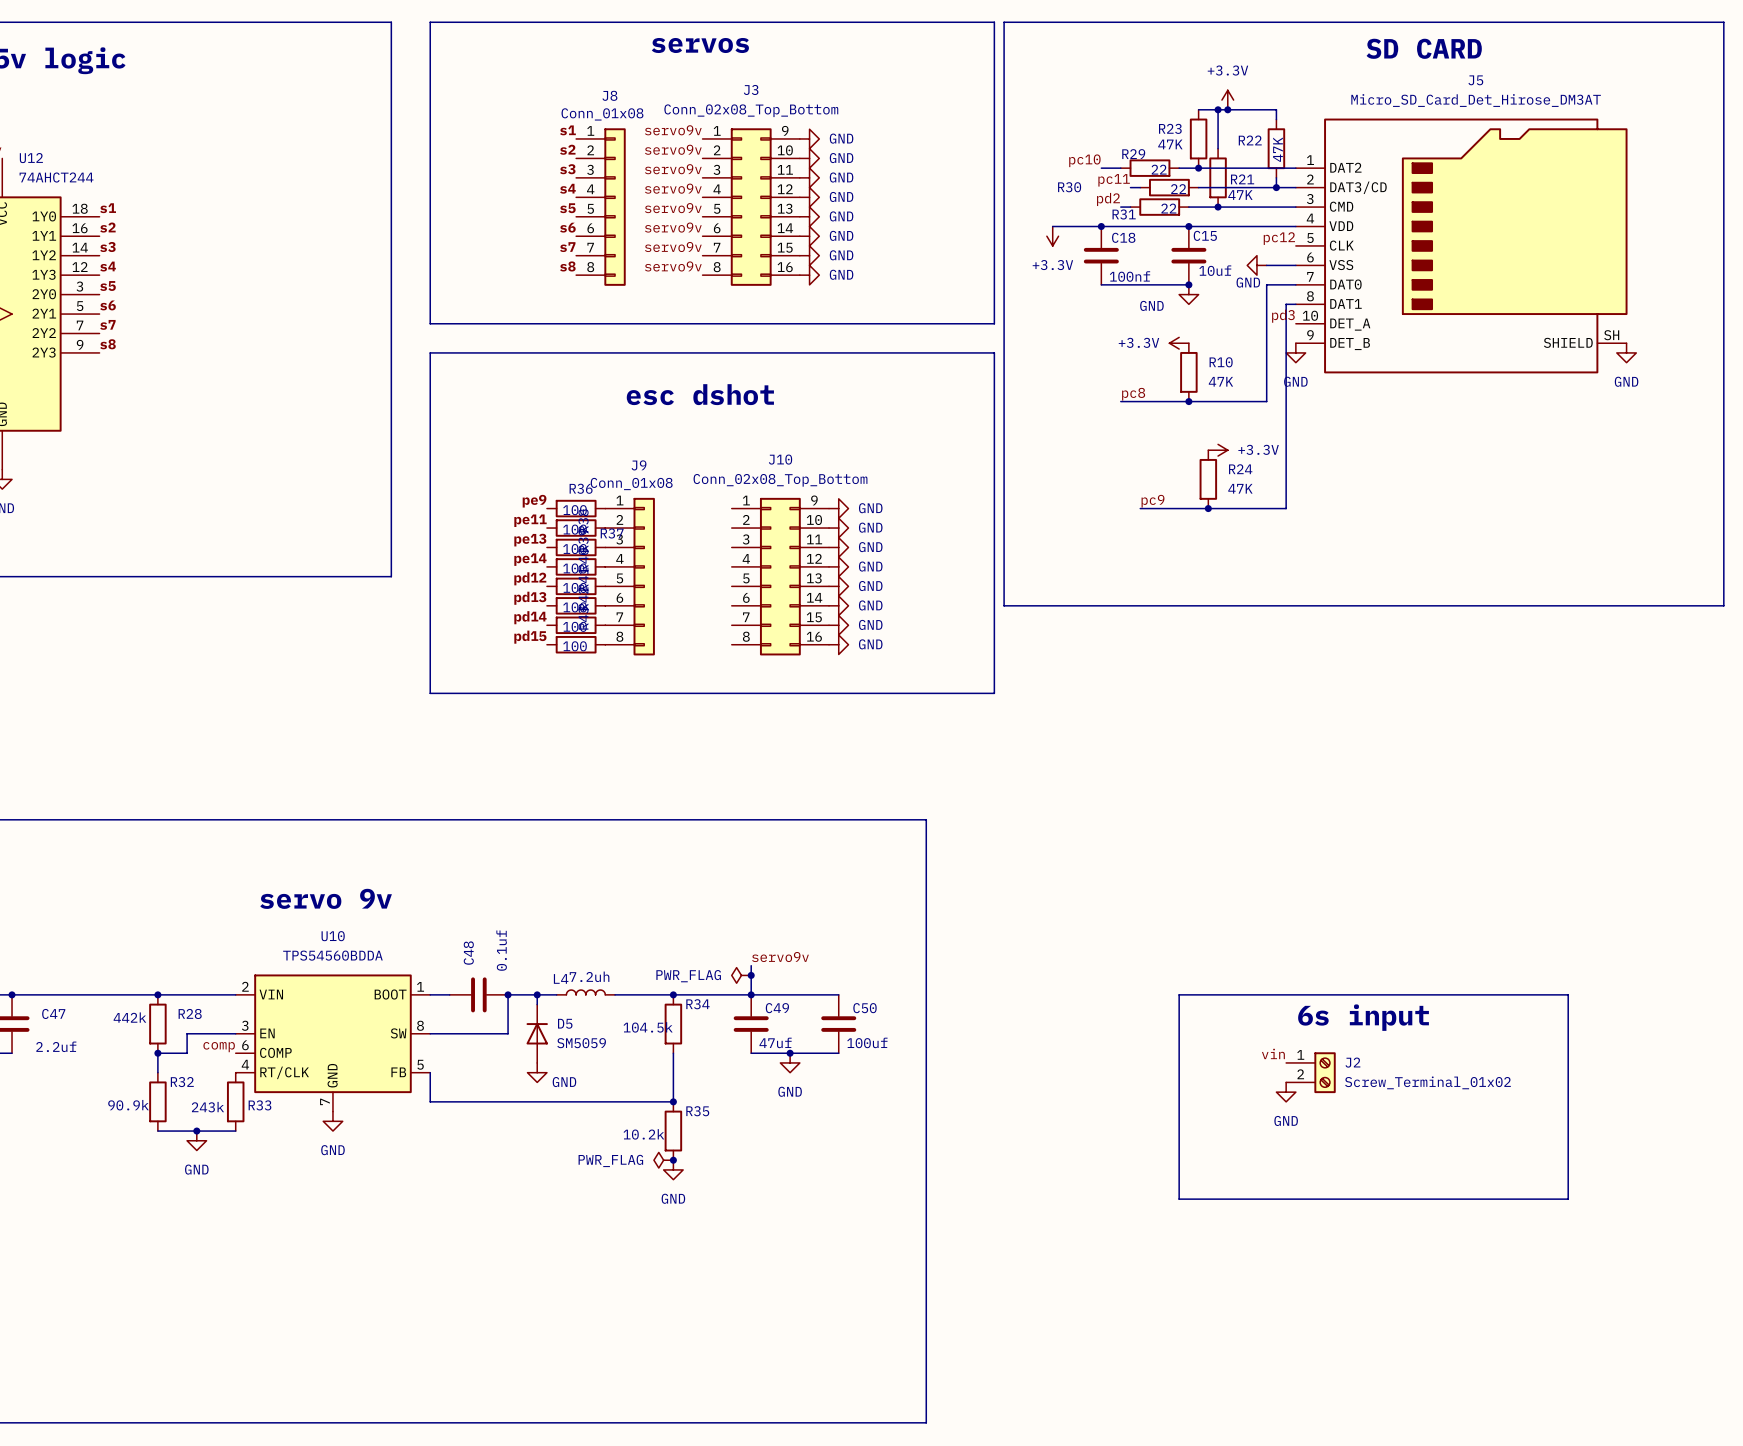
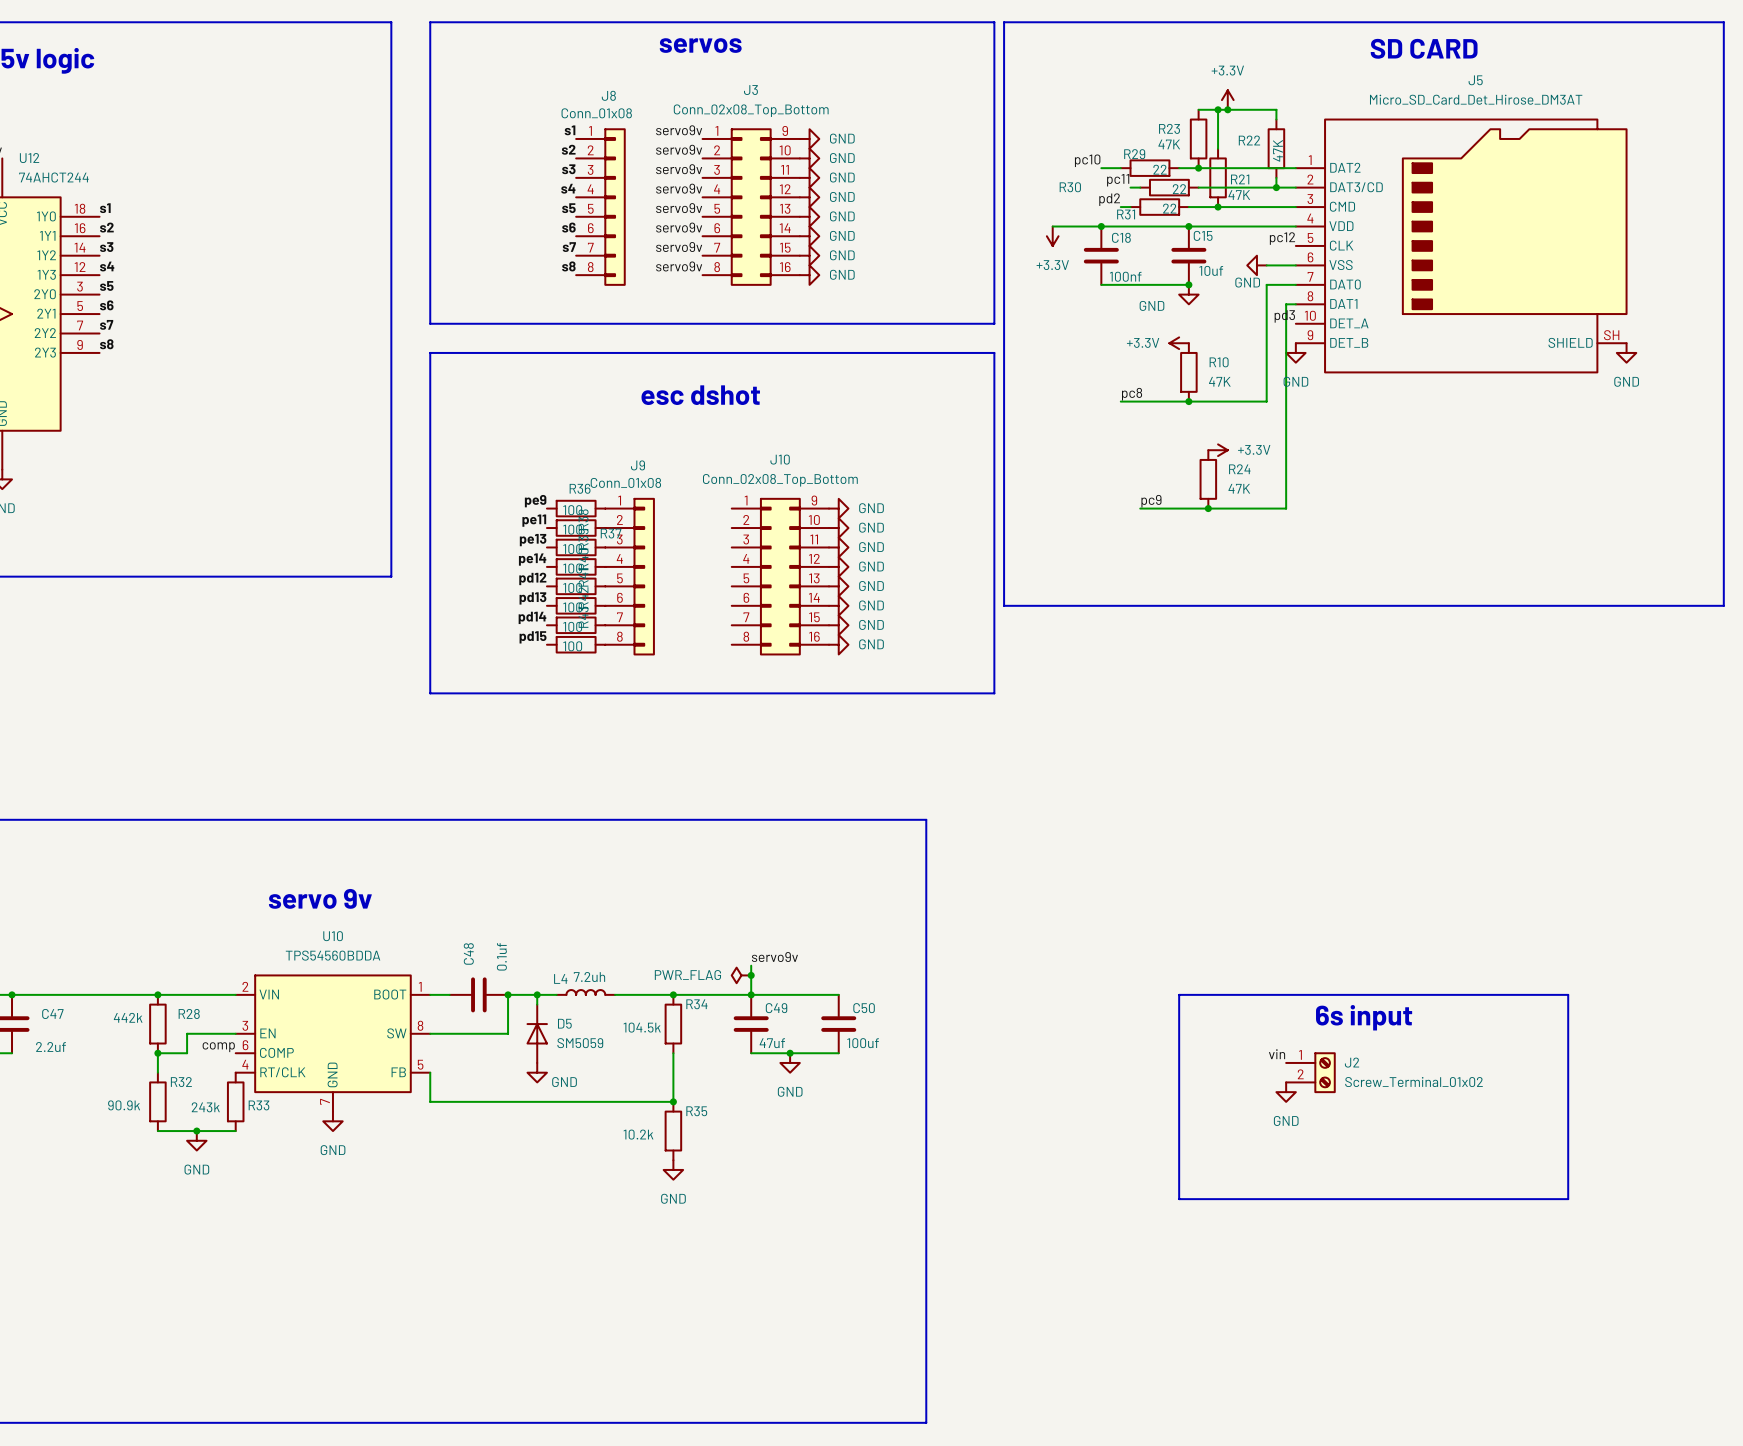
power symbol: PWR_FLAG (663, 1160) -> none
junction: (673, 1160) -> none

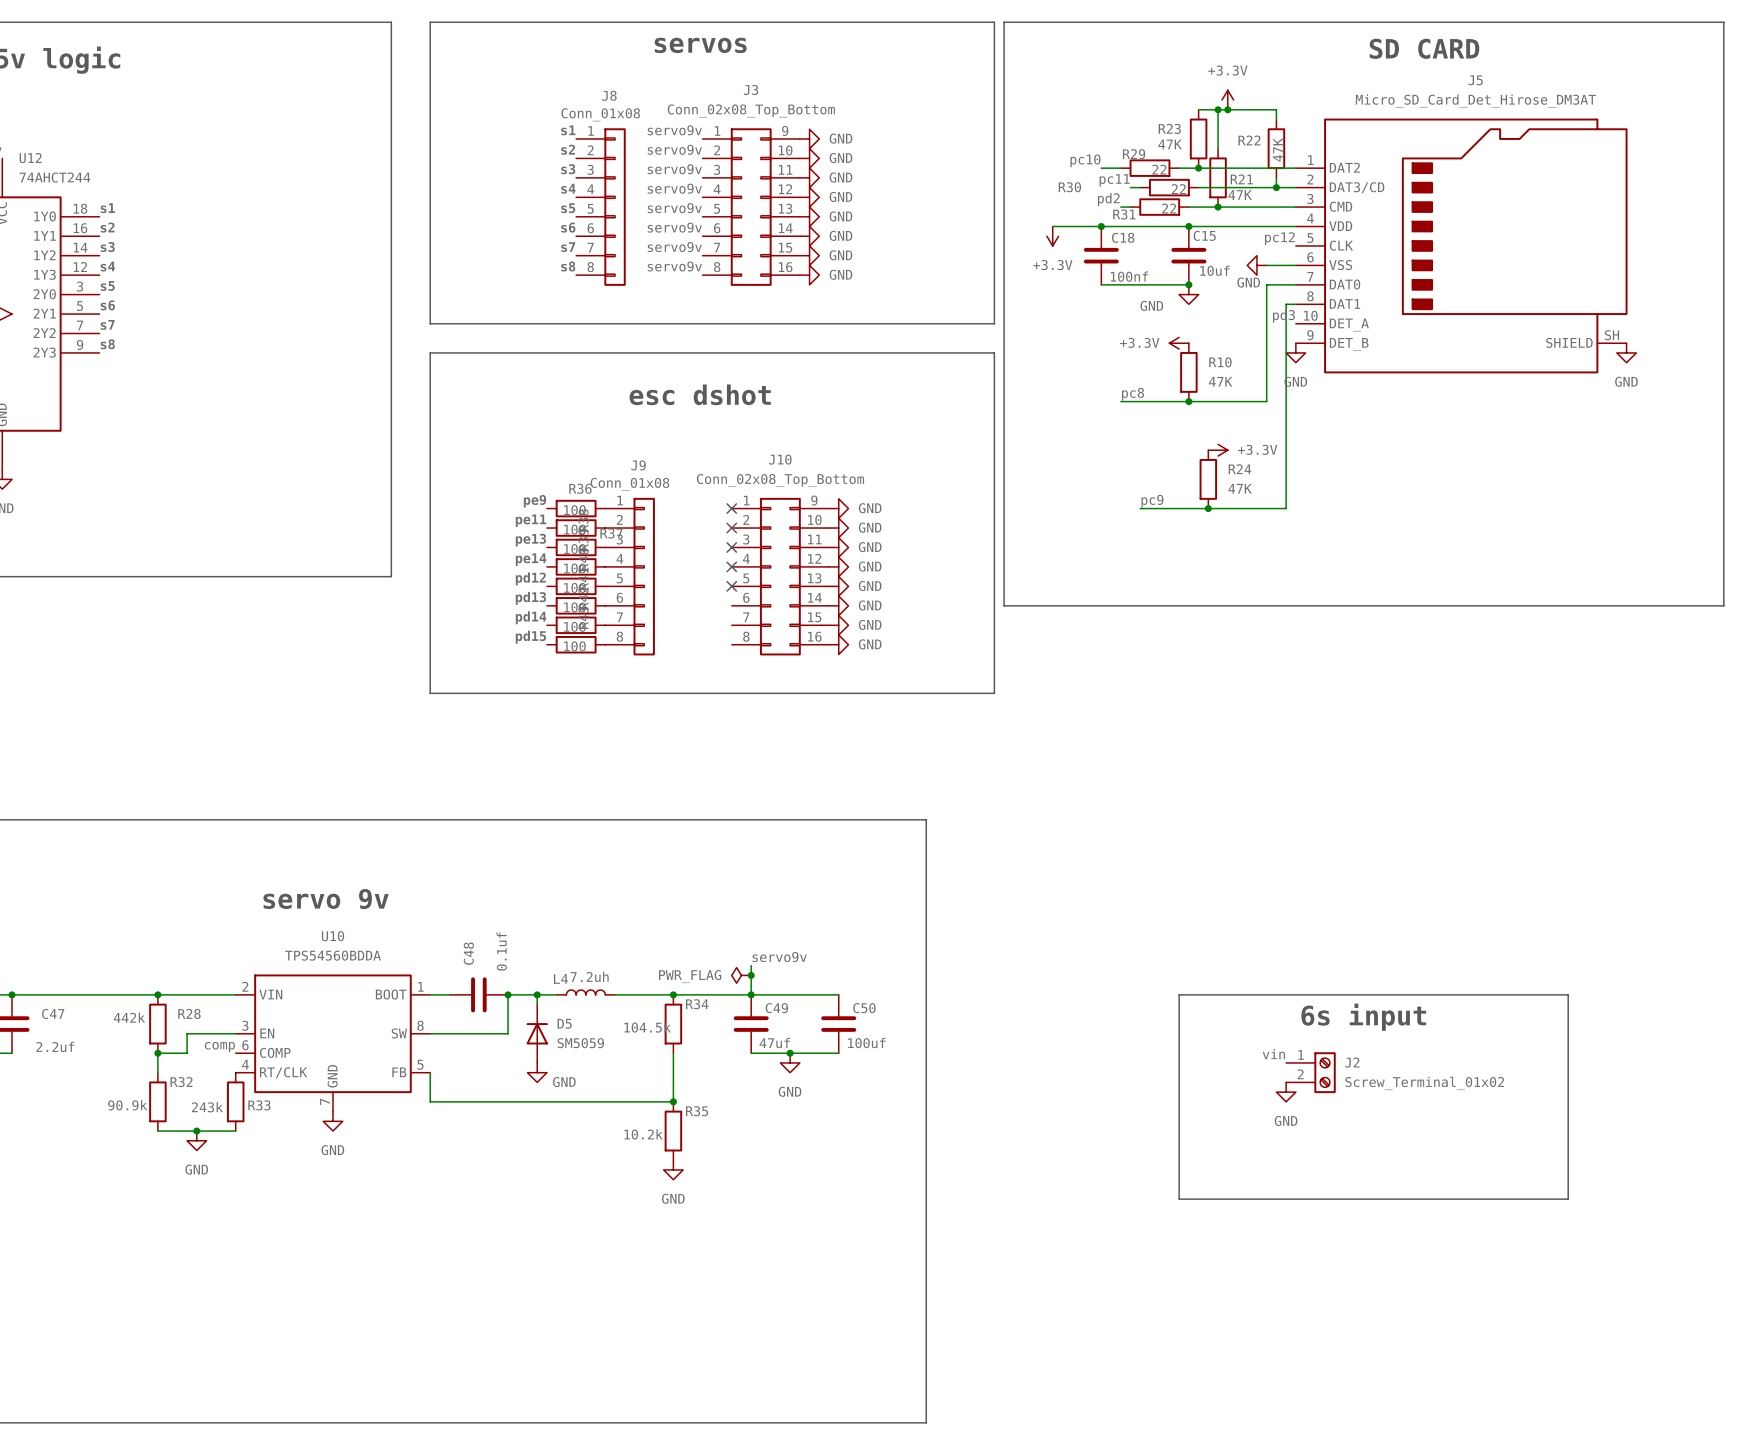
no-connect mark: none -> (731, 508)
no-connect mark: none -> (731, 528)
no-connect mark: none -> (731, 547)
no-connect mark: none -> (731, 566)
no-connect mark: none -> (731, 586)

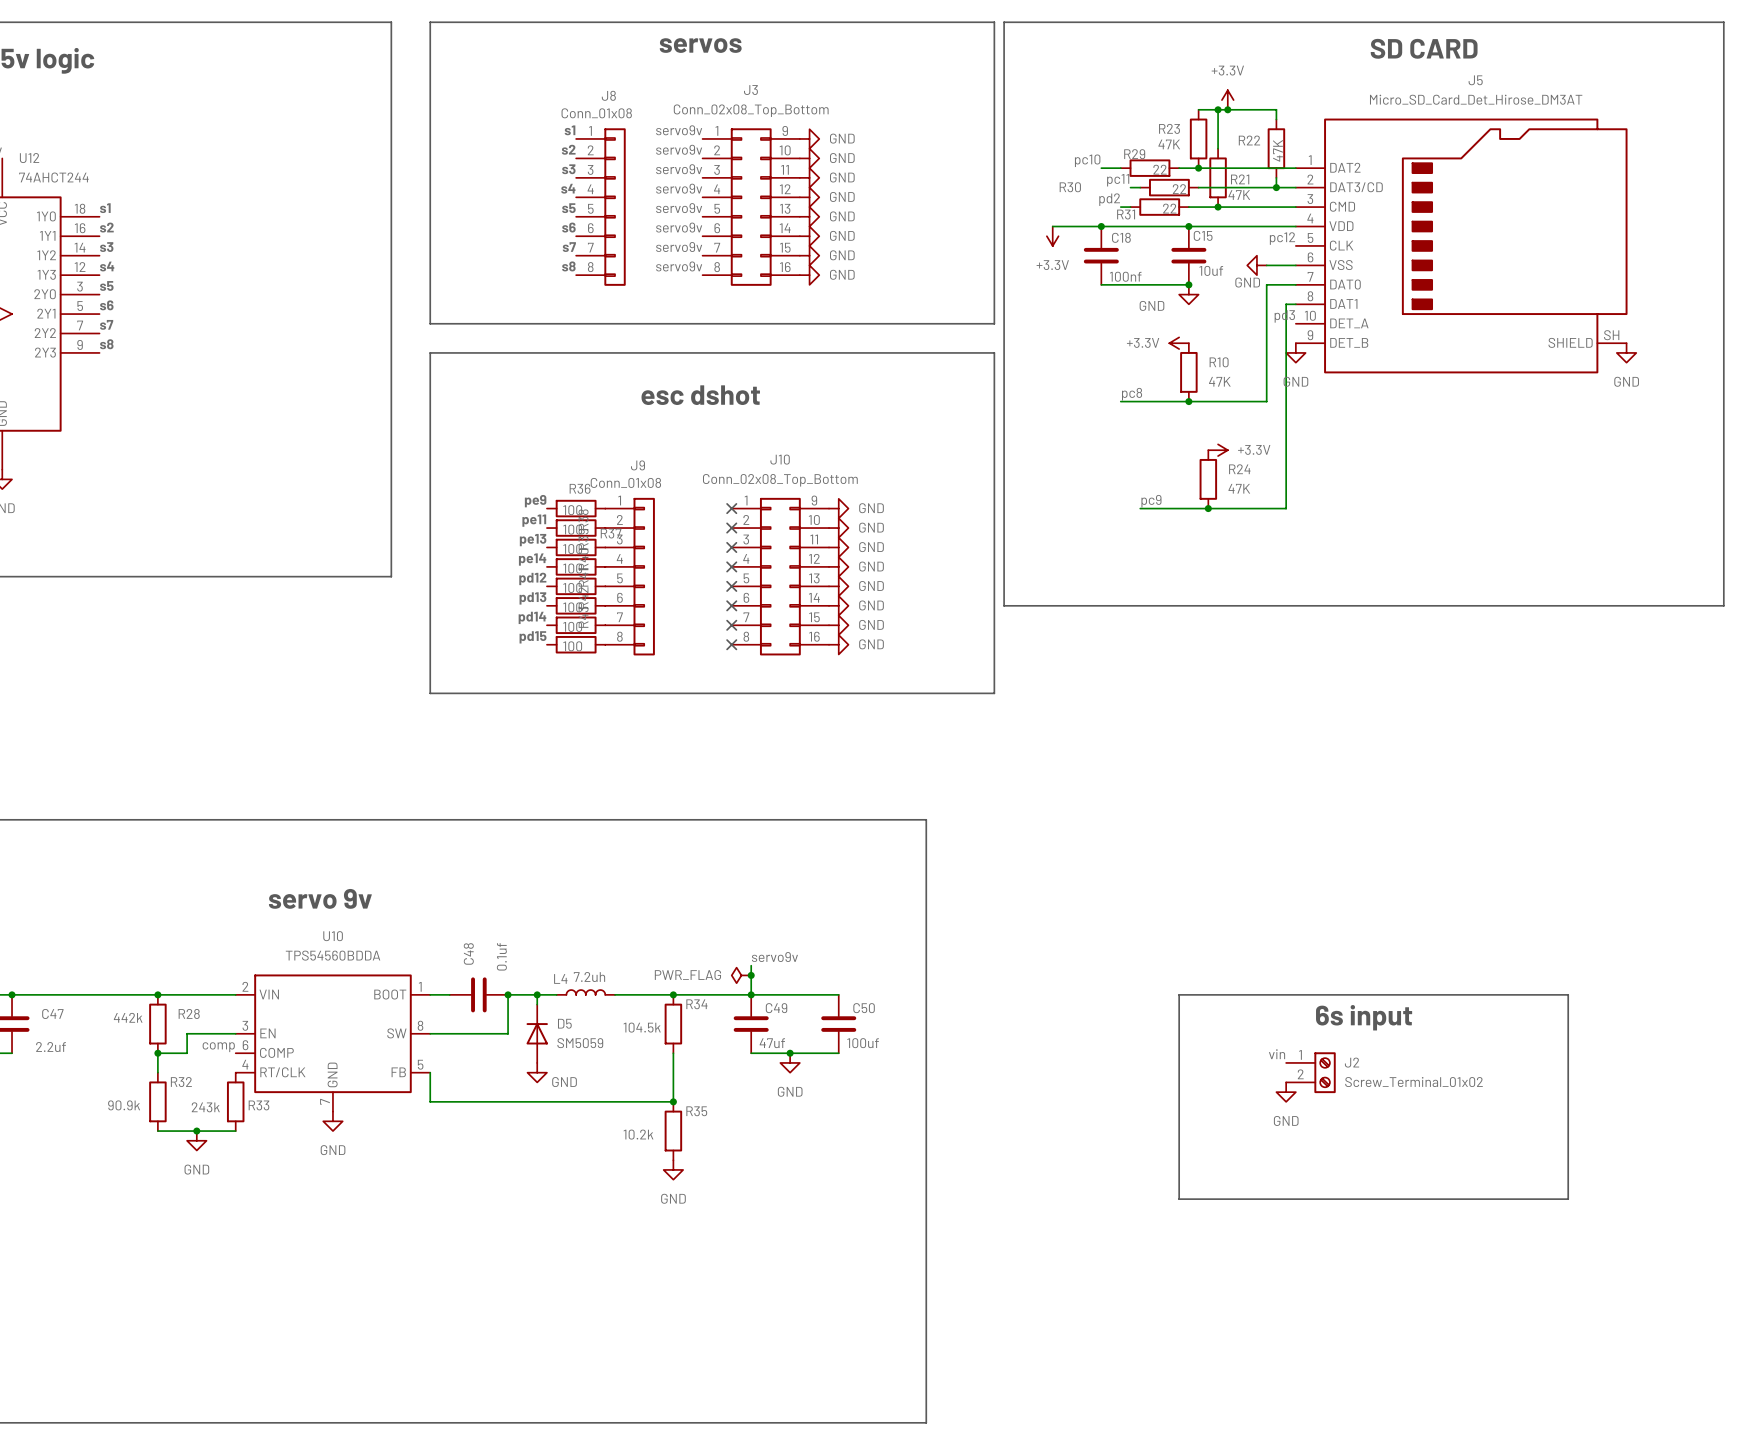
no-connect mark: none -> (731, 605)
no-connect mark: none -> (731, 625)
no-connect mark: none -> (731, 644)

